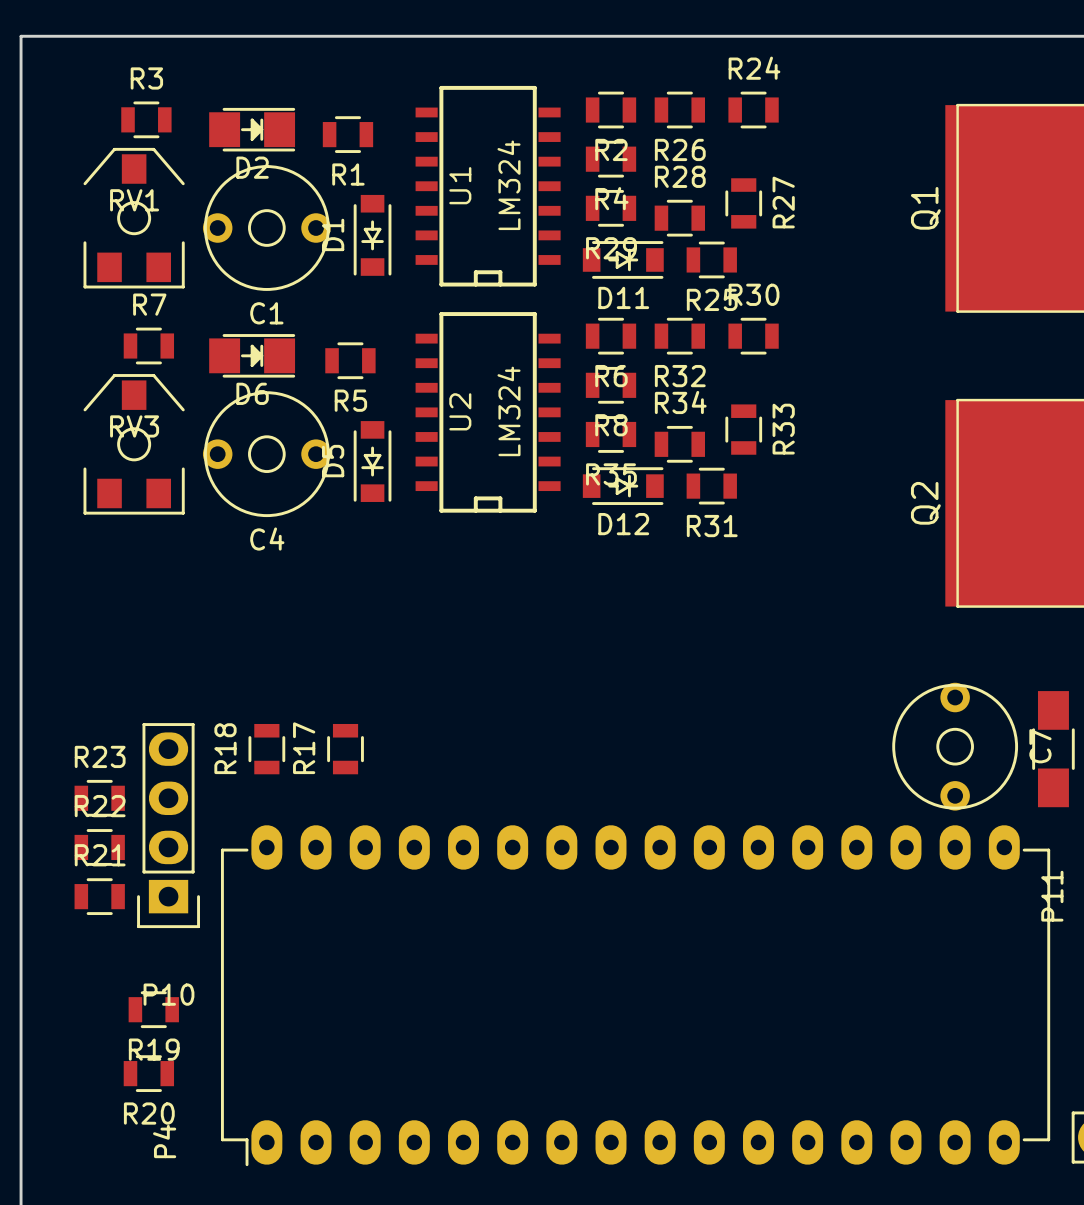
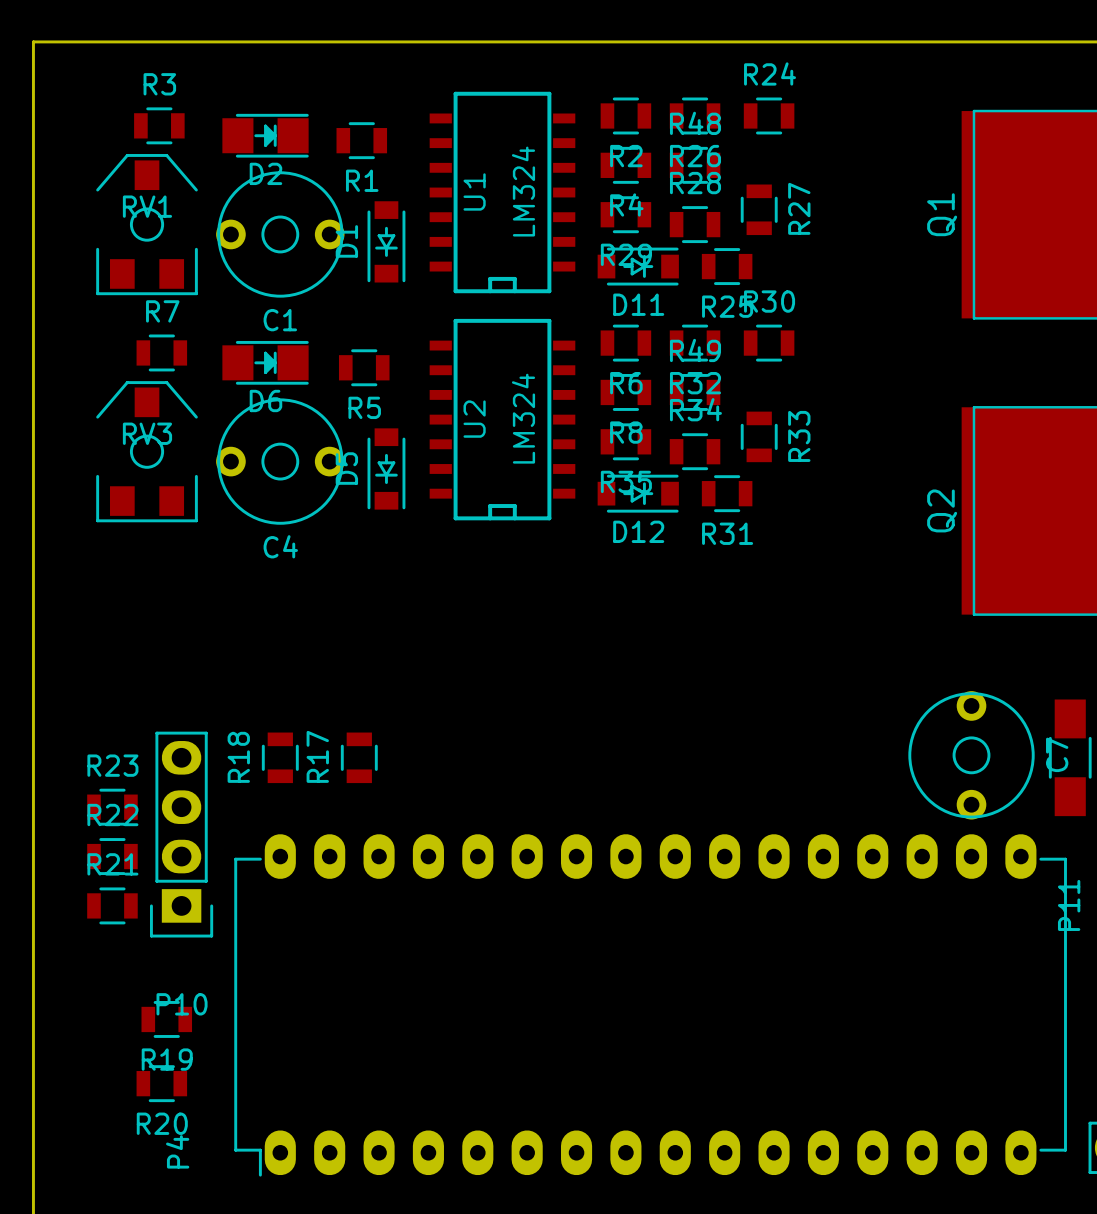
R48: none -> (695, 165)
R49: none -> (695, 392)

